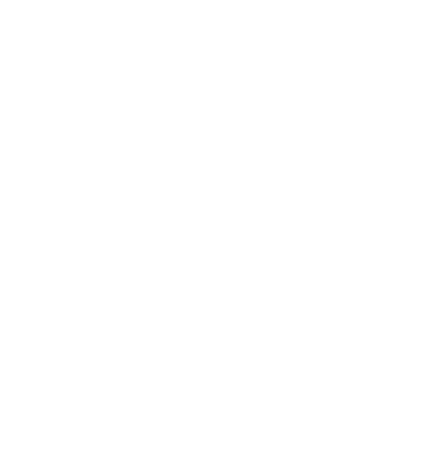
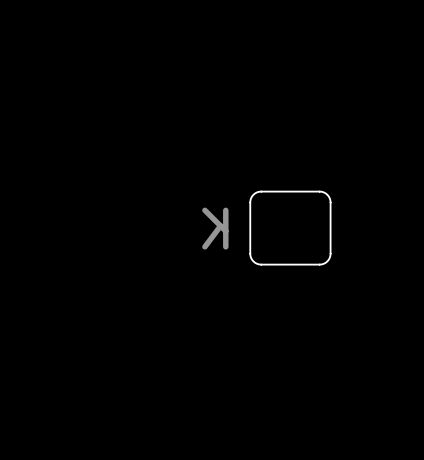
part: none -> (290, 228)

